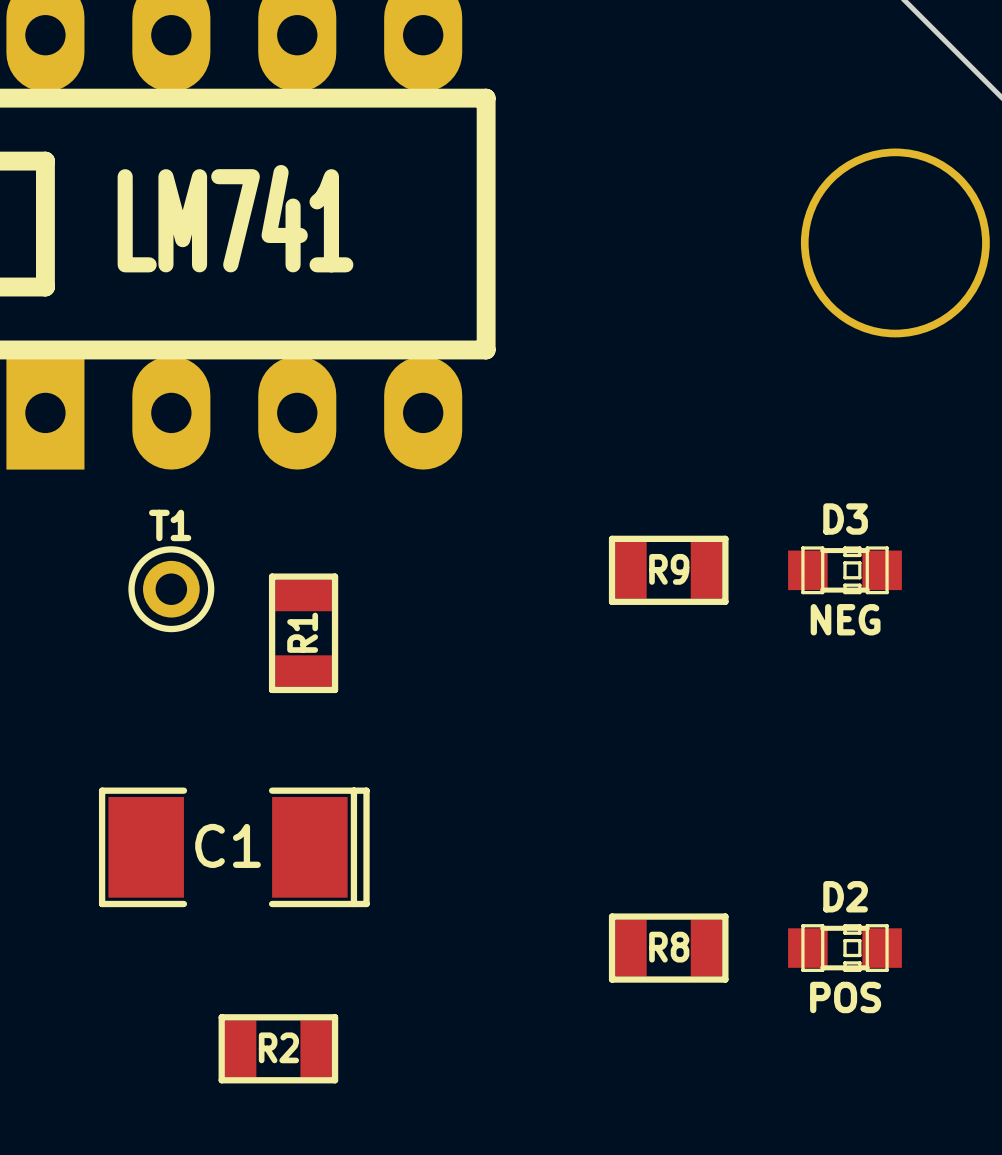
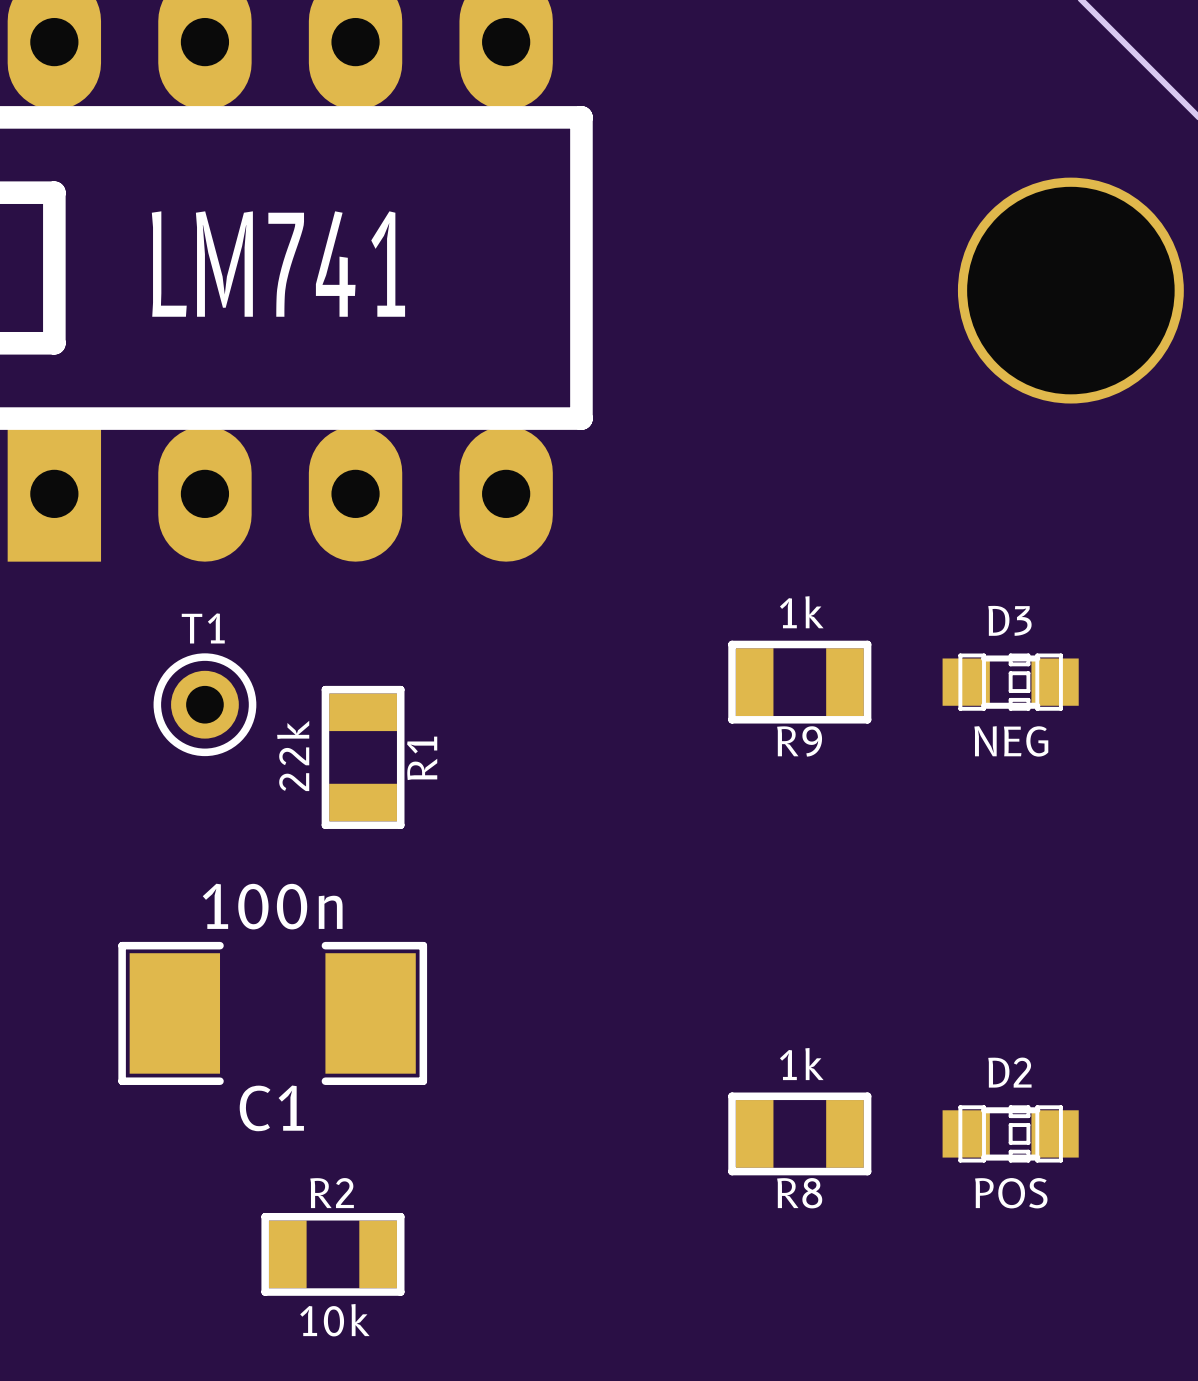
R9 value: none -> 1k (801, 612)
R9 name position: R9 (669, 569) -> R9 (799, 741)
R1 name position: R1 (302, 632) -> R1 (422, 758)
R1 value: none -> 22k (293, 755)
C1 value: none -> 100n (272, 906)
C1 footprint: [98, 787, 370, 908] -> [118, 941, 428, 1085]
C1 name position: C1 (228, 845) -> C1 (271, 1108)
R8 value: none -> 1k (801, 1064)
R8 name position: R8 (669, 947) -> R8 (799, 1193)
R2 name position: R2 (278, 1047) -> R2 (332, 1193)
R2 value: none -> 10k (334, 1320)

